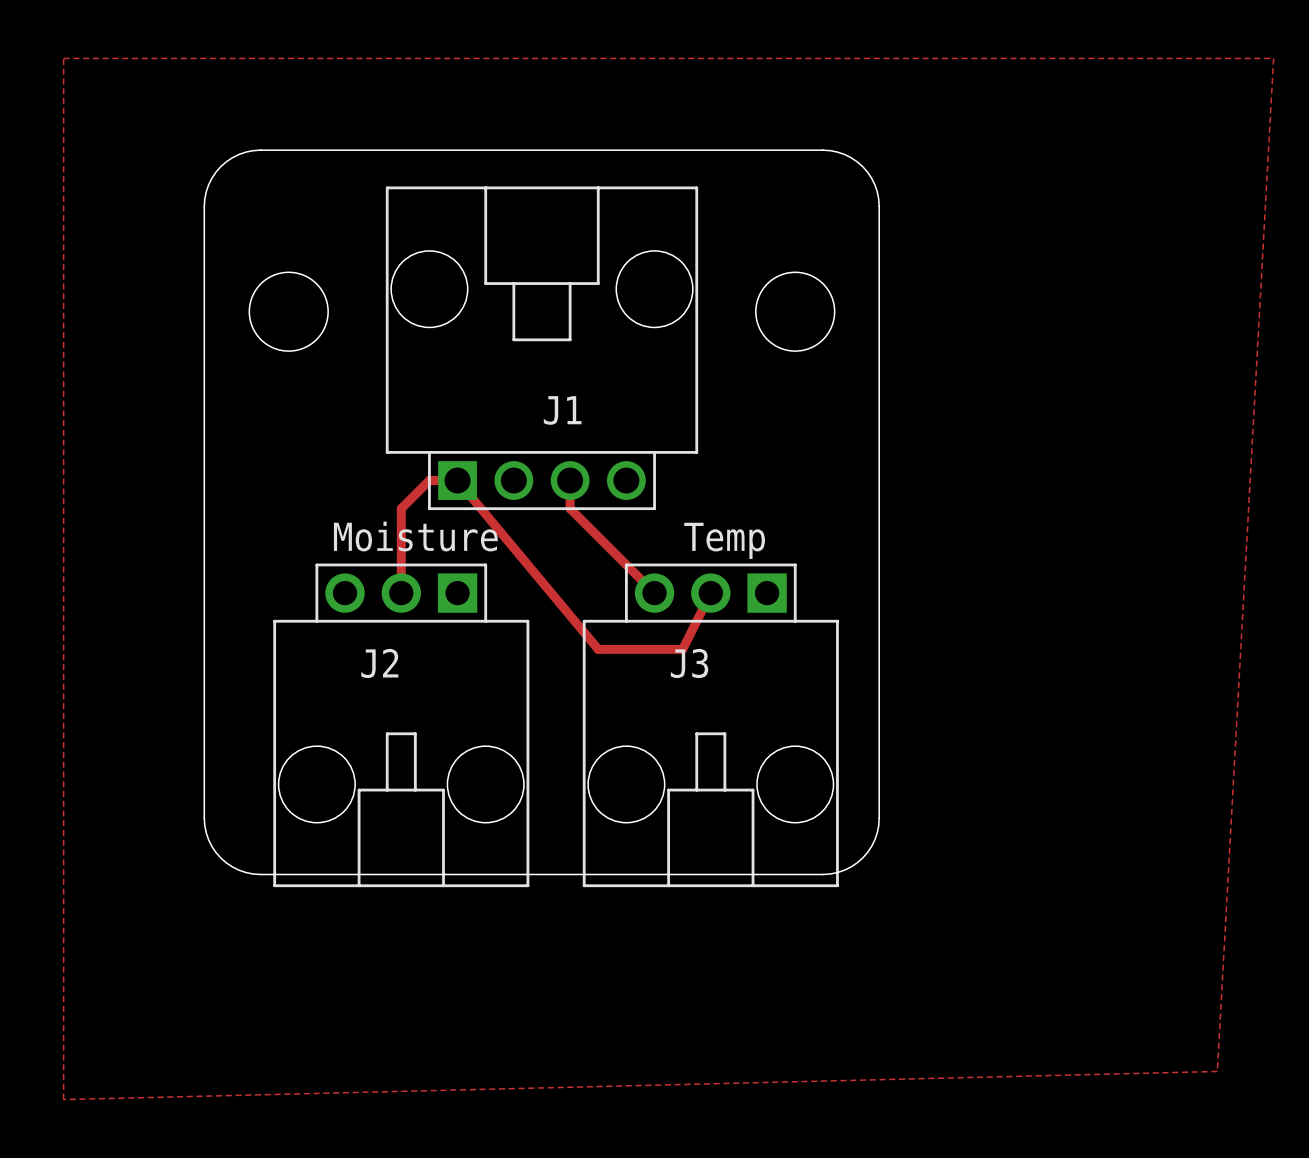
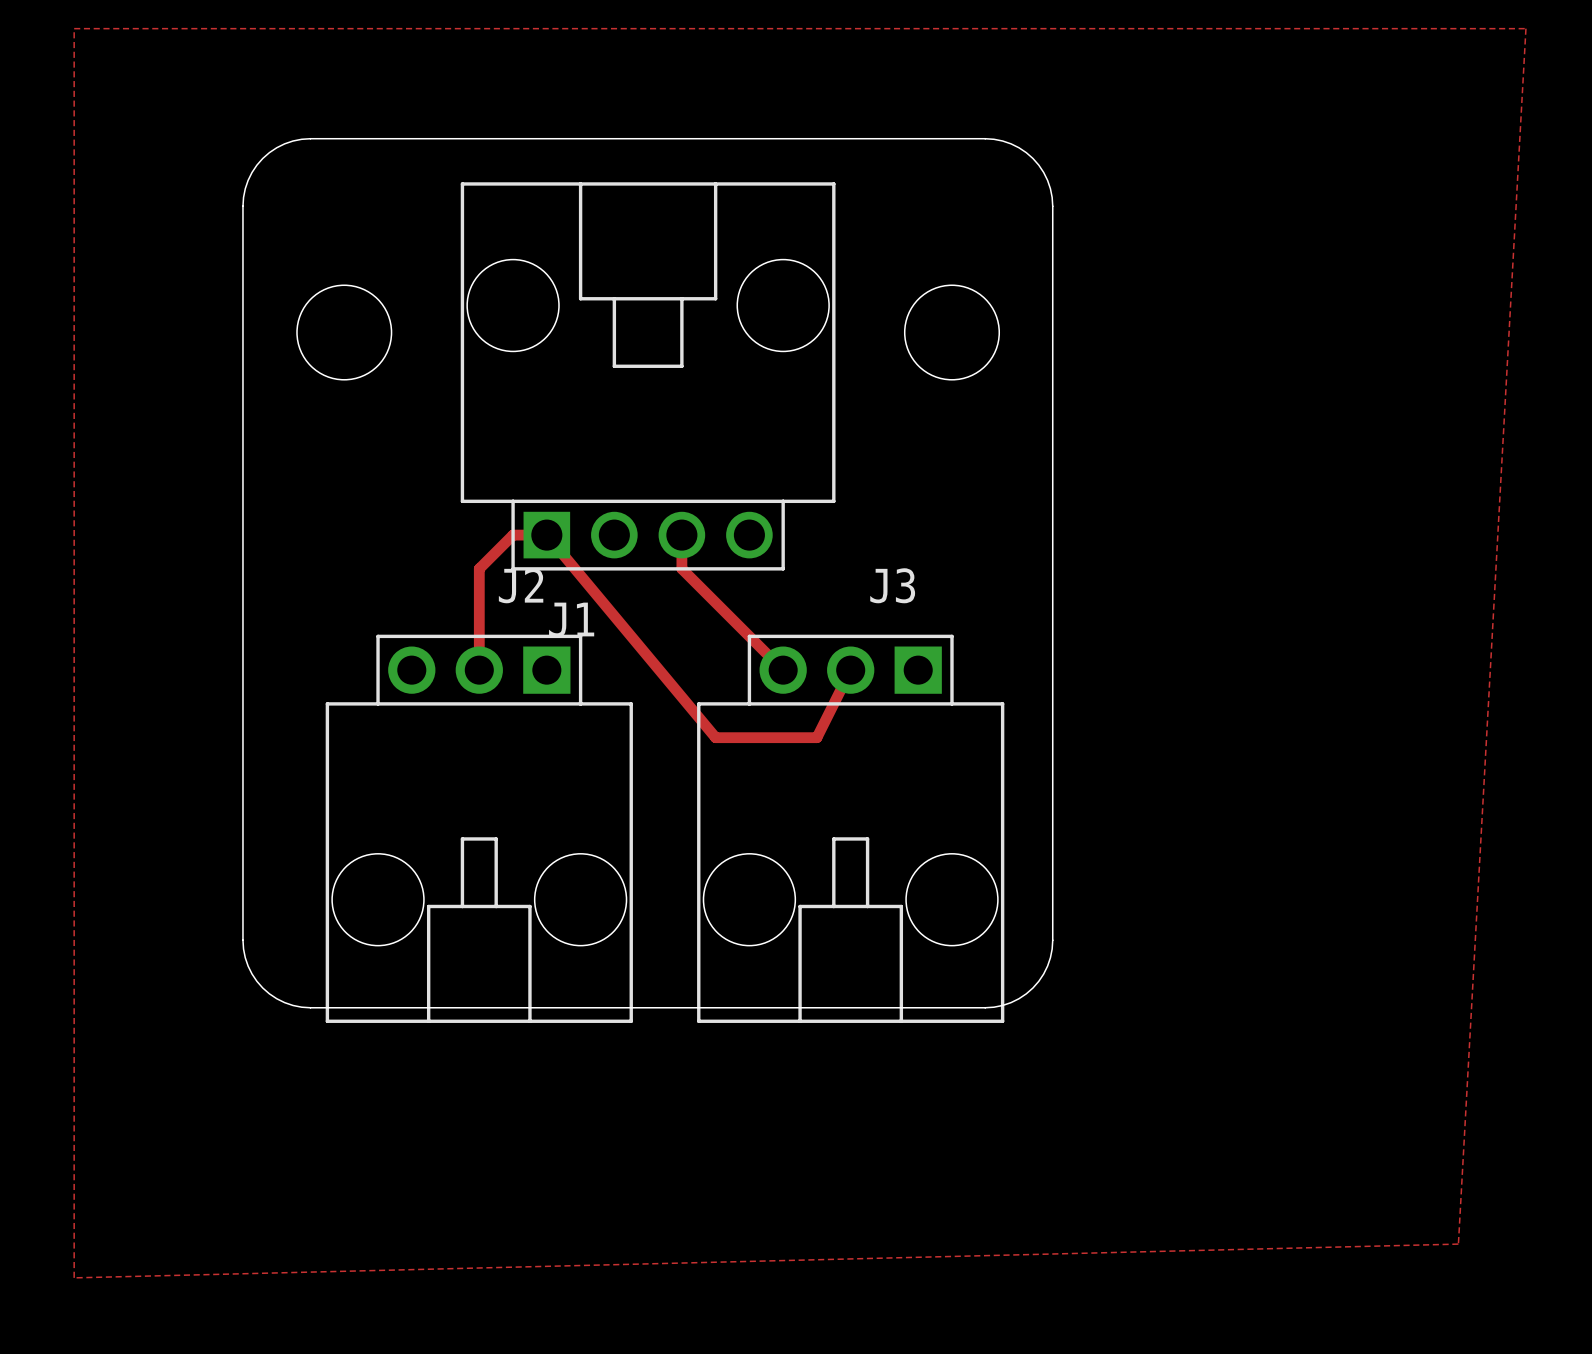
J1 name position: J1 (562, 410) -> J1 (571, 619)
text: Moisture (415, 536) -> none
text: Temp (724, 540) -> none
J2 name position: J2 (379, 663) -> J2 (521, 585)
J3 name position: J3 (689, 663) -> J3 (892, 585)

